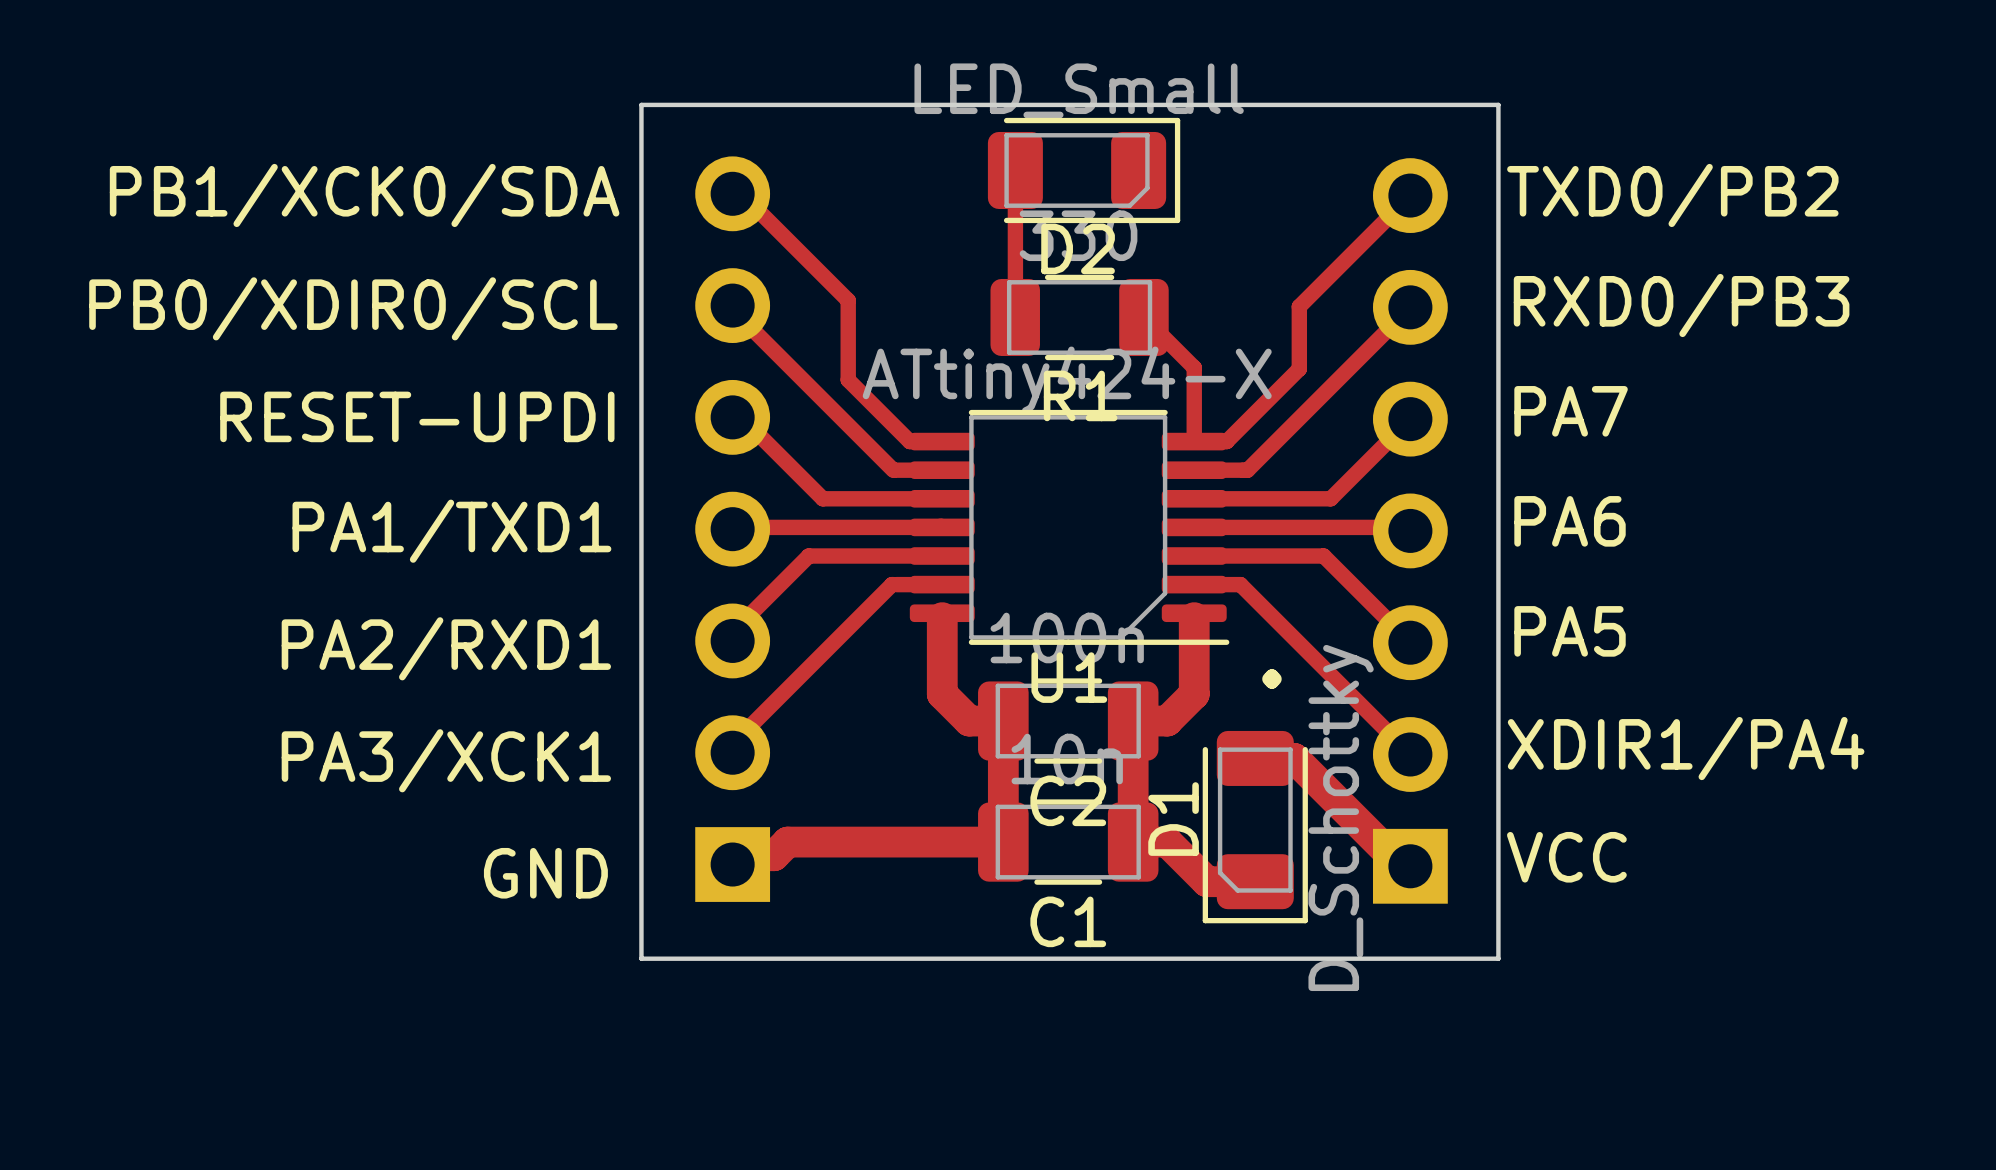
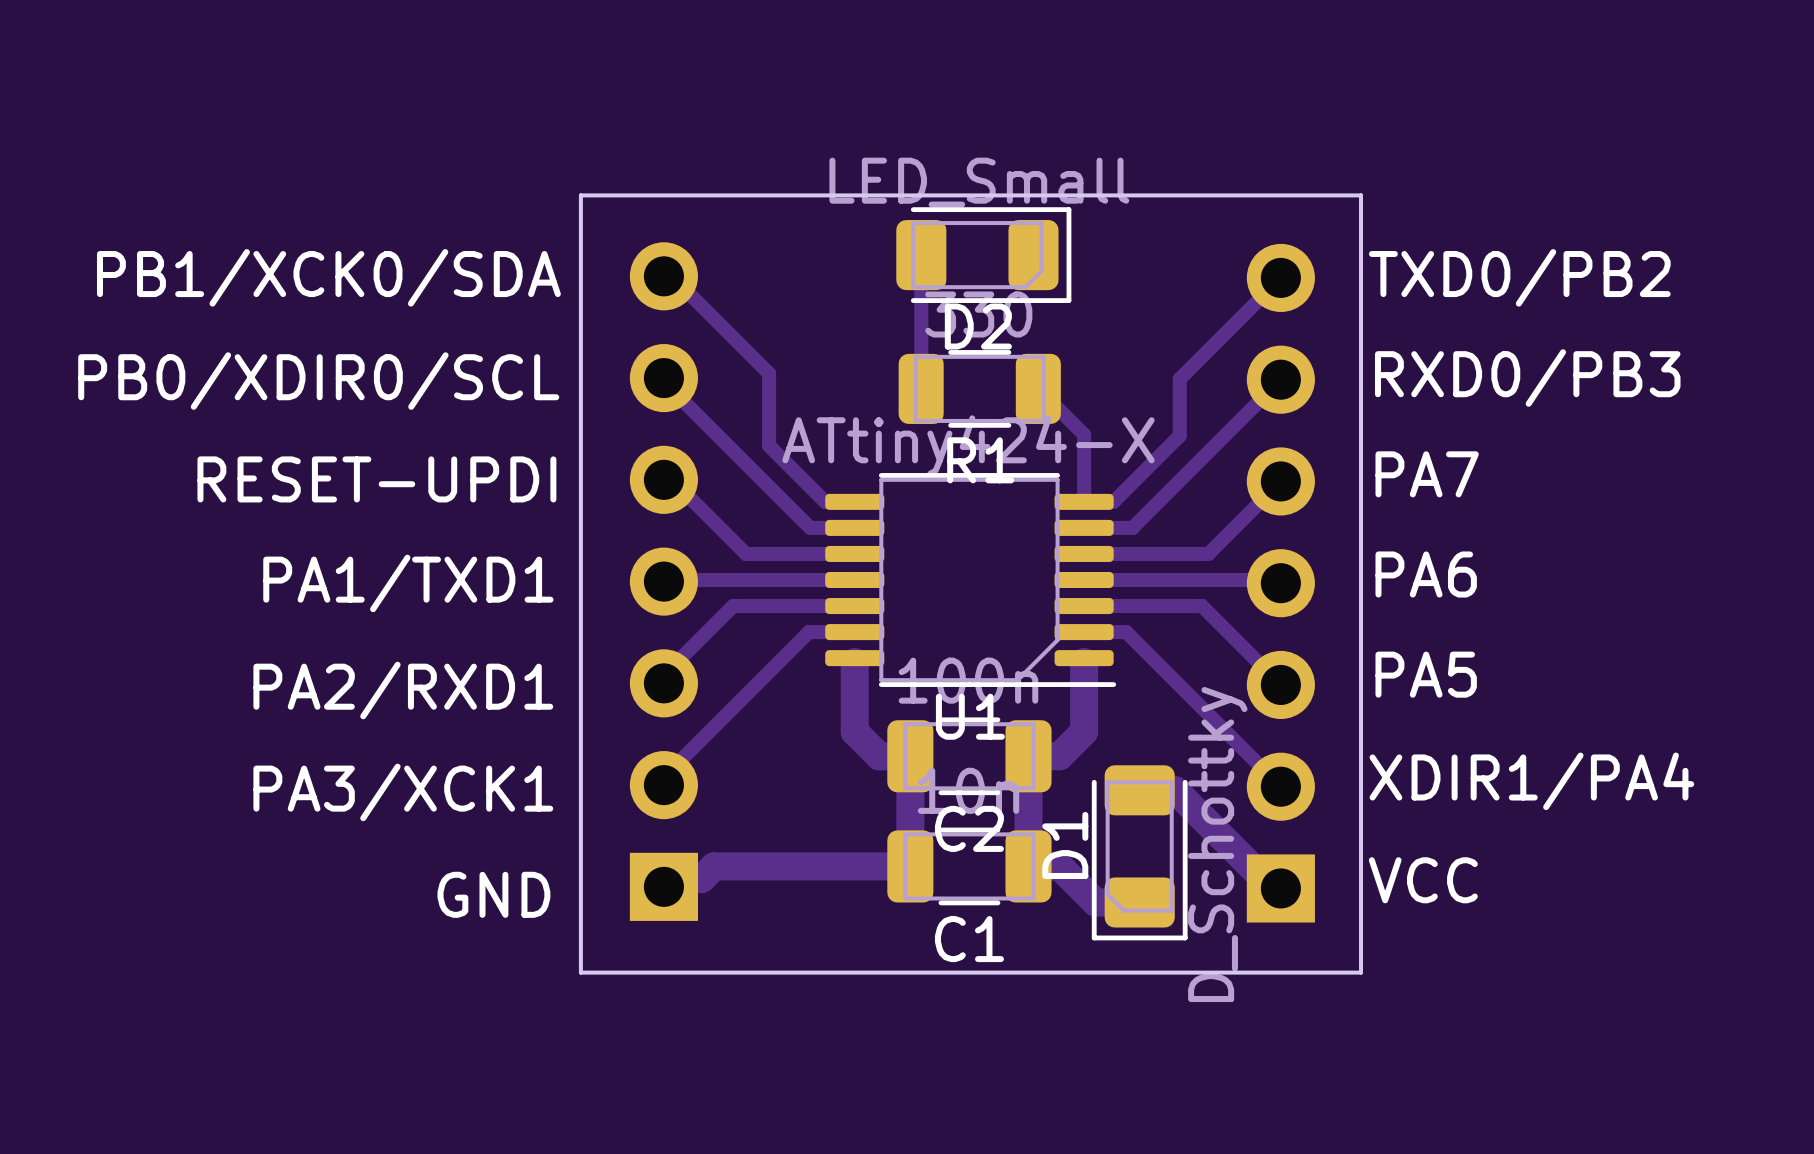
text: . (1271, 679) -> none

